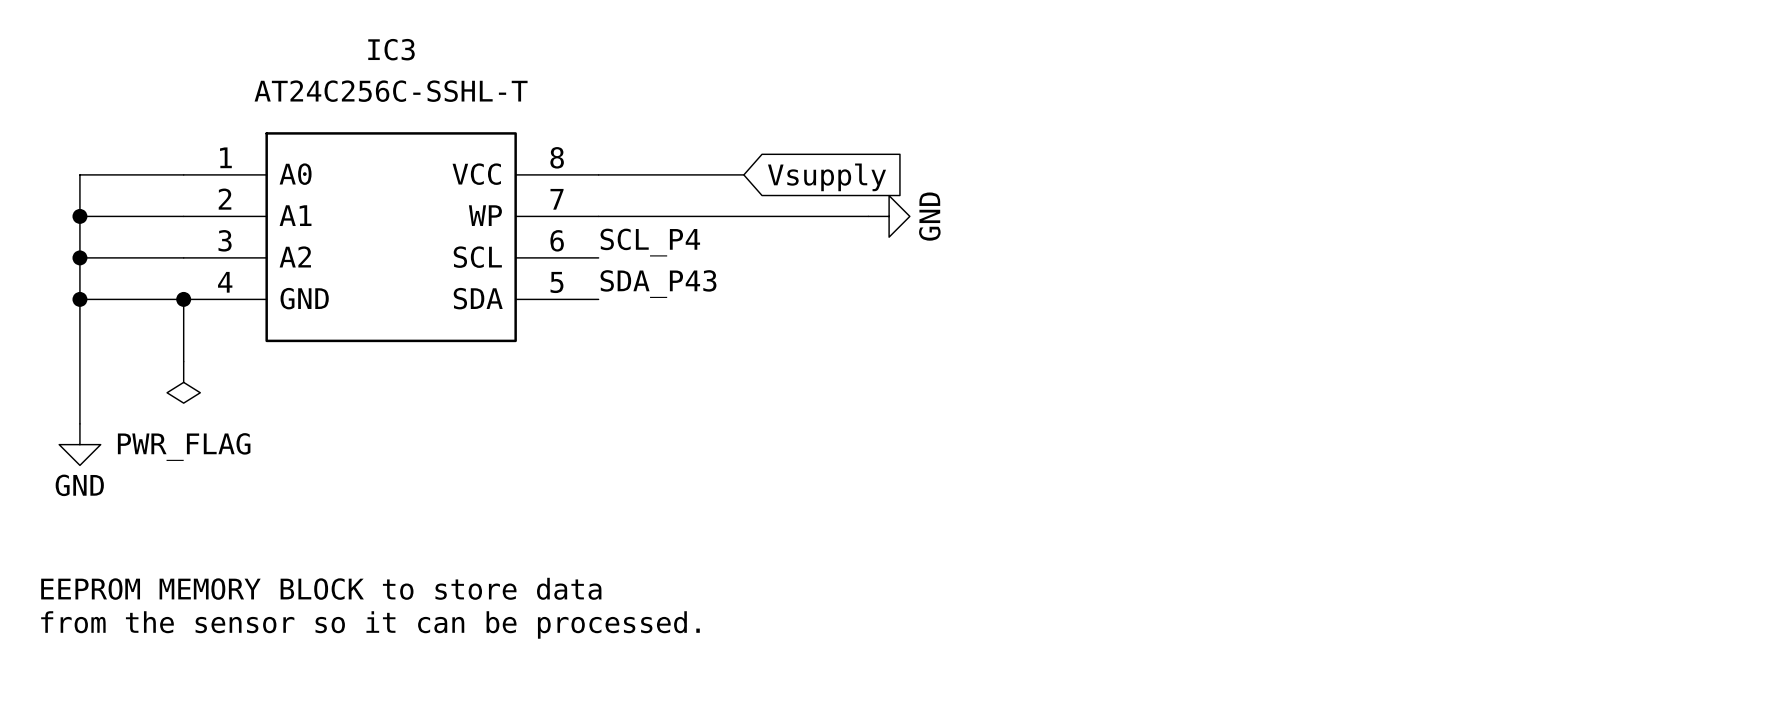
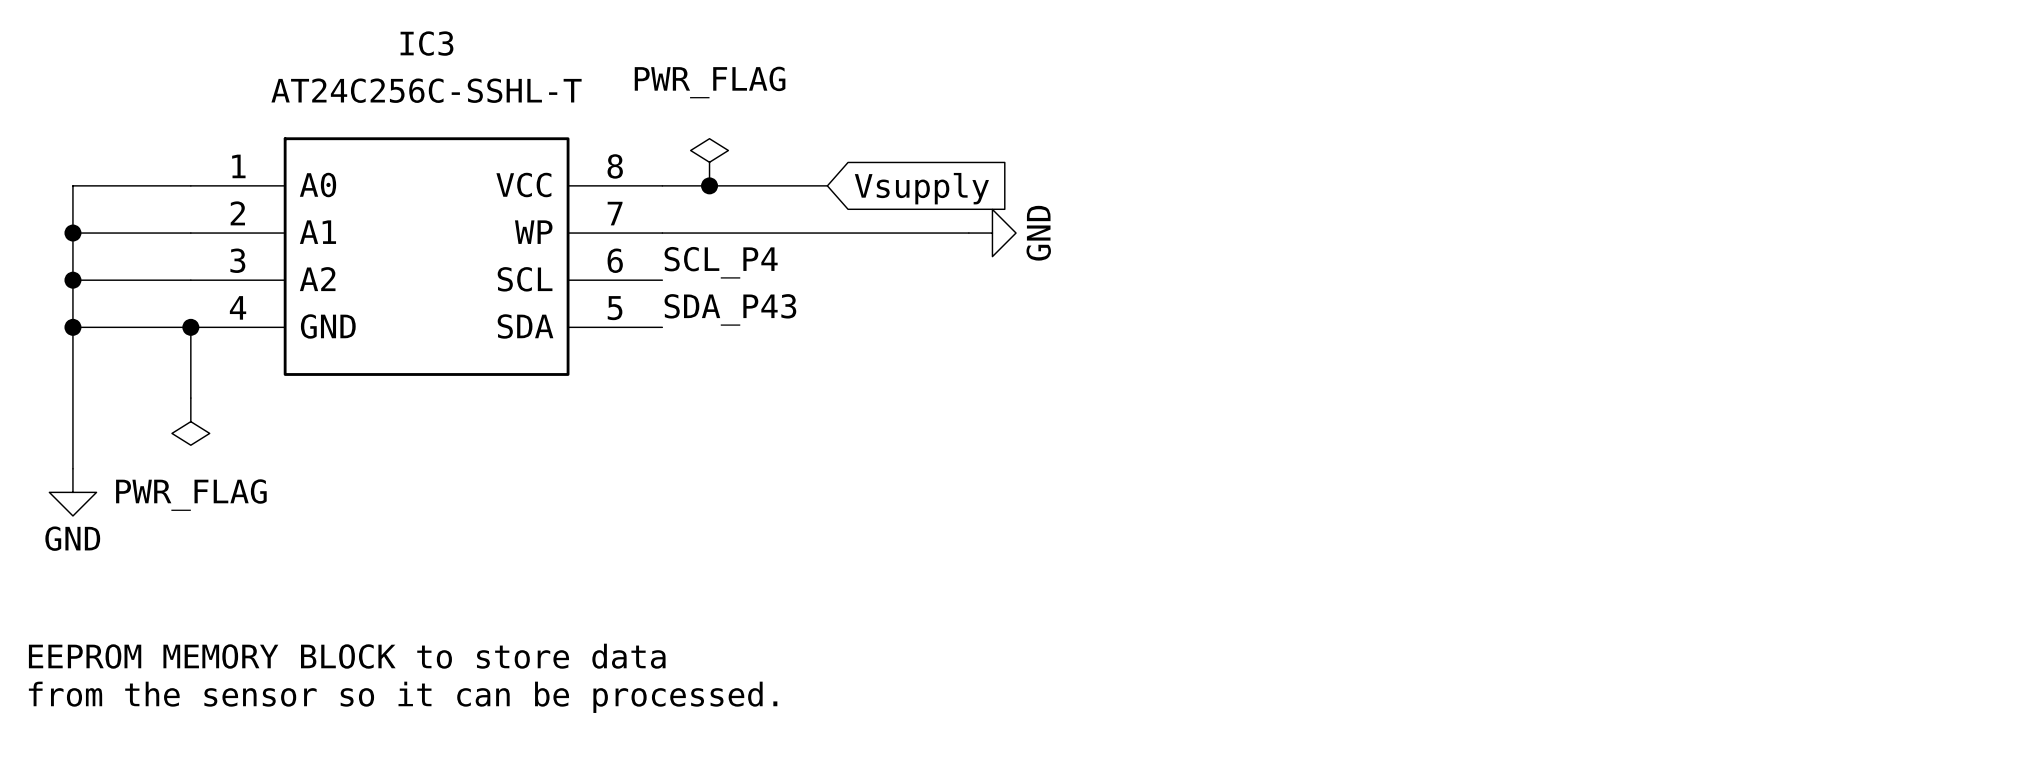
power symbol: none -> PWR_FLAG (709, 162)
junction: none -> (709, 185)

